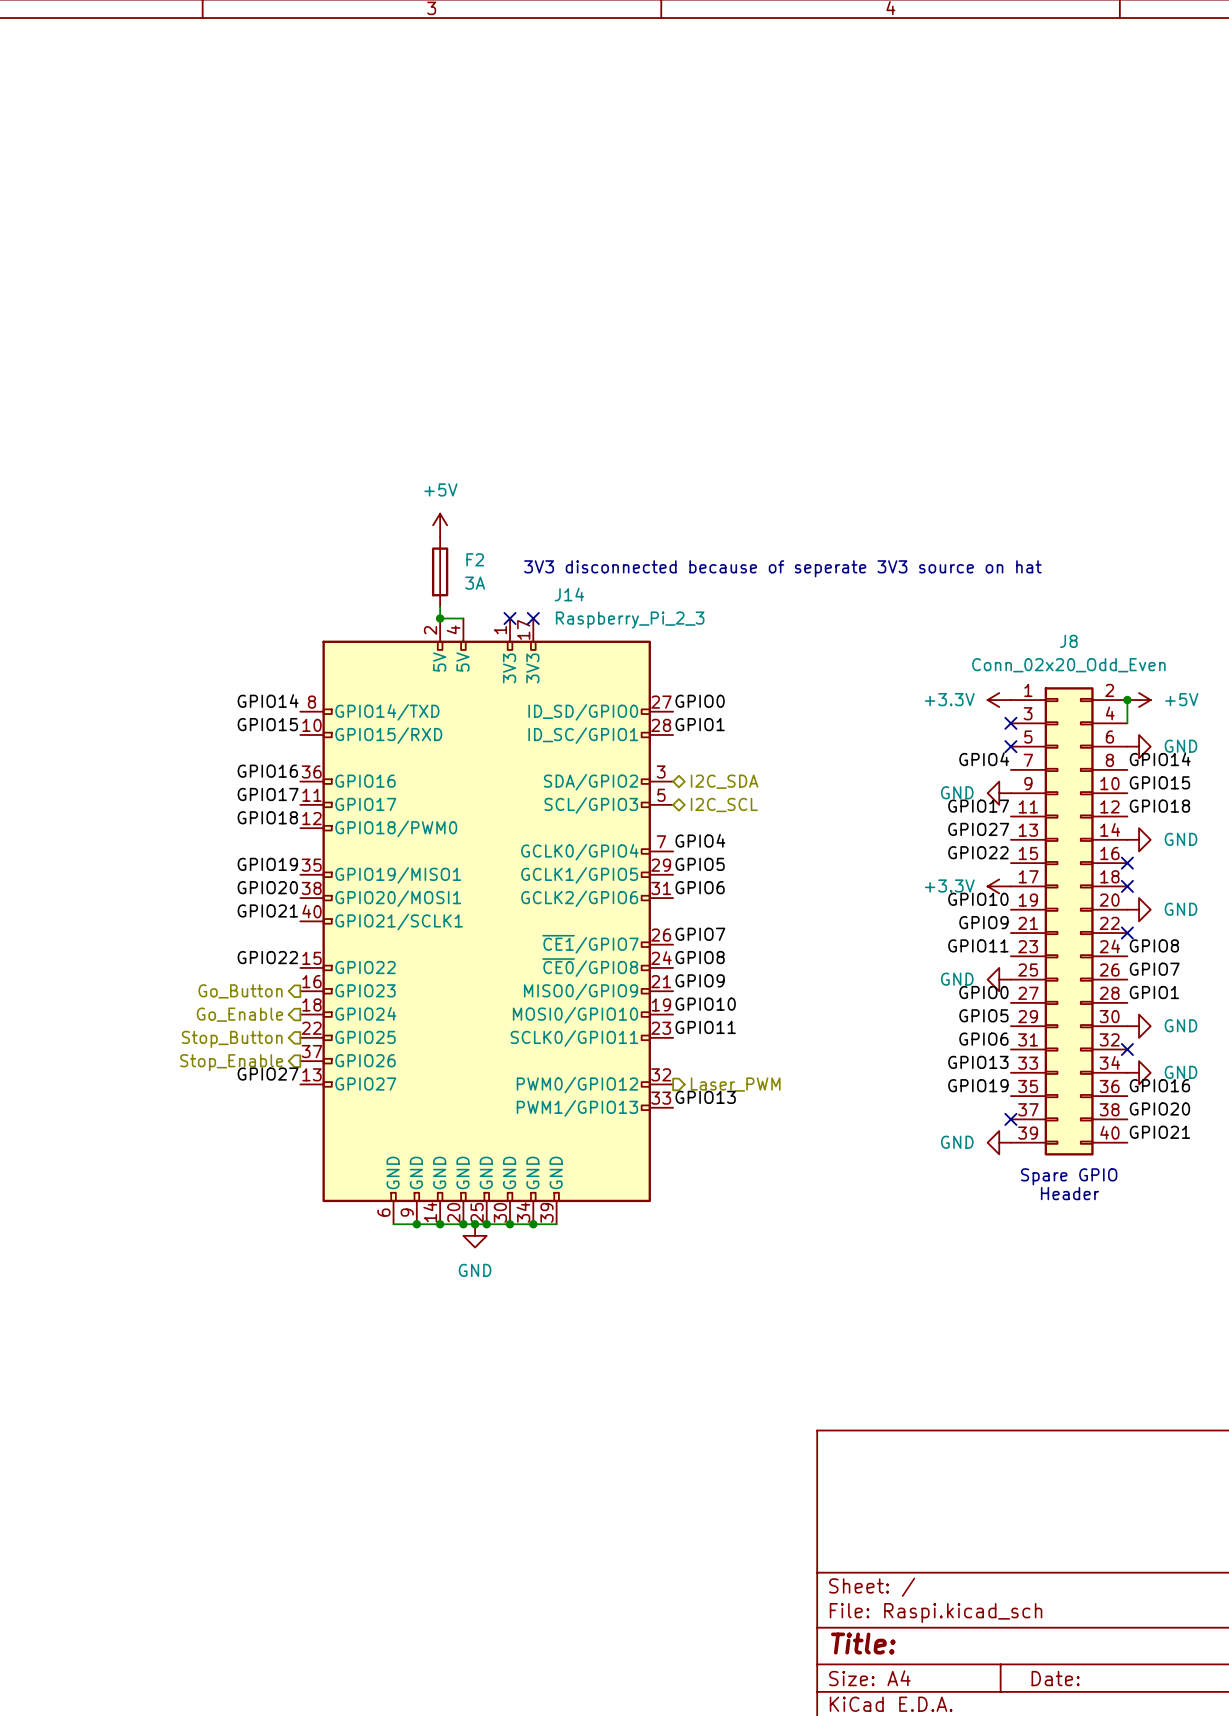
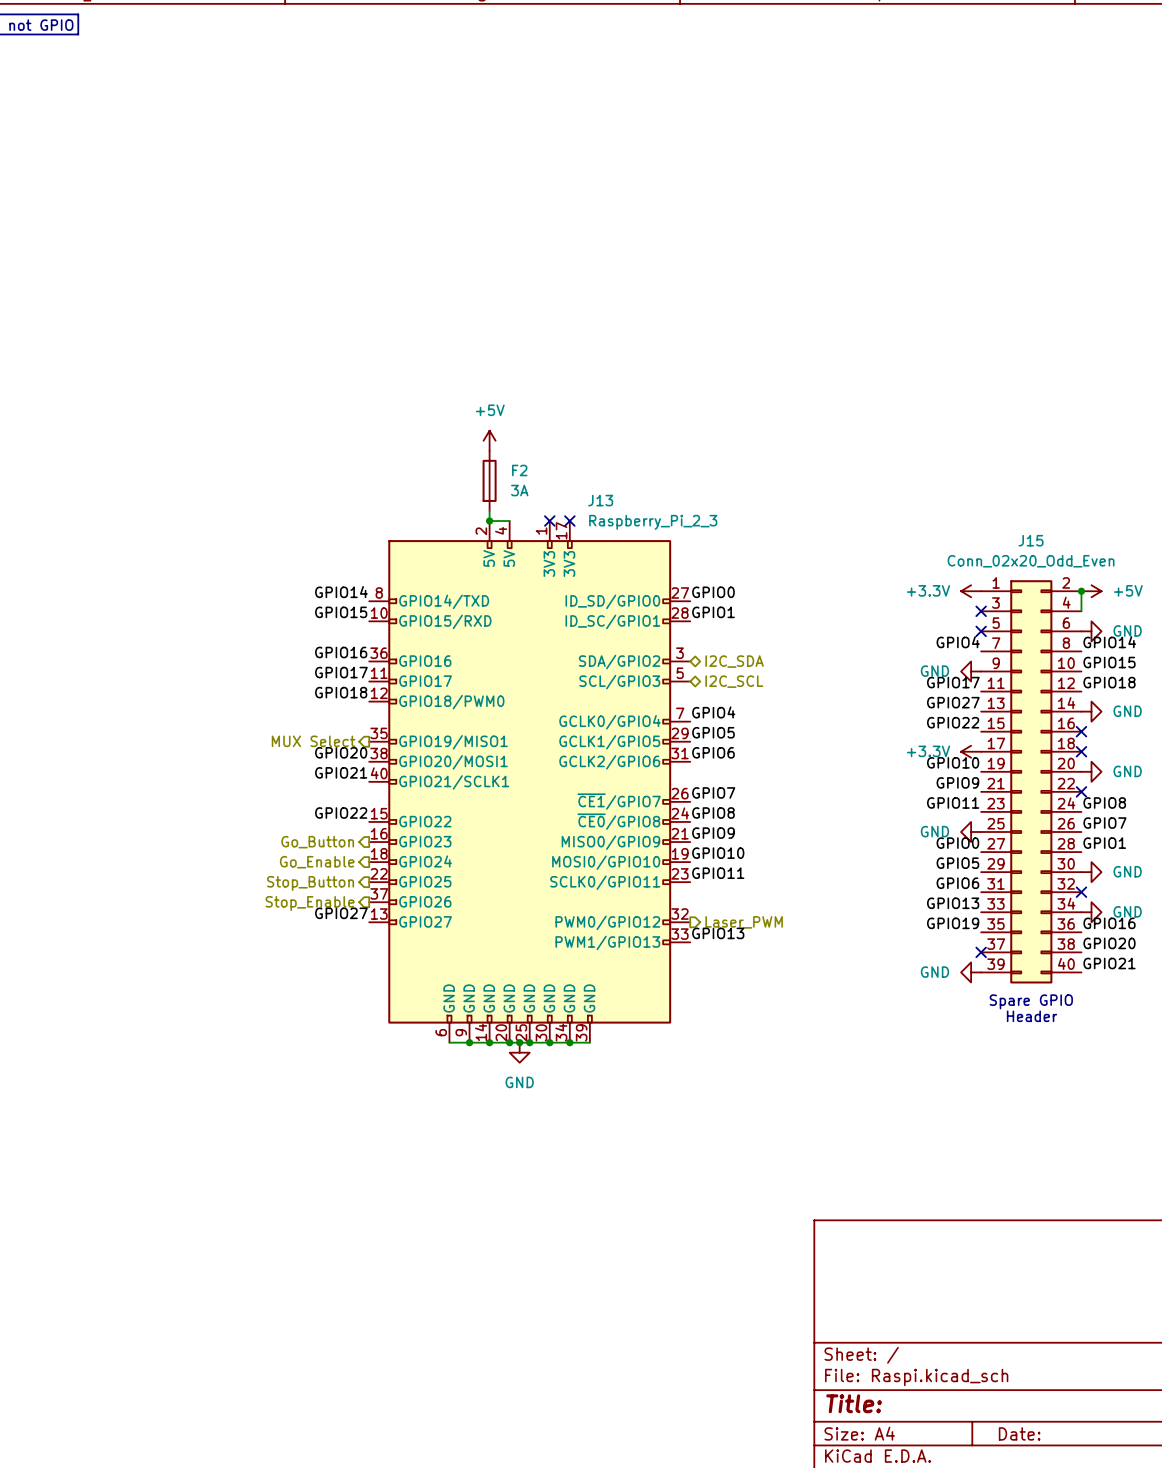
text: 3V3 disconnected because of seperate 3V3 source on hat (782, 568) -> none
J14 name: J14 (569, 594) -> J13 (600, 500)
J8 name: J8 (1068, 641) -> J15 (1031, 540)
label: GPIO19 (267, 864) -> none
hierarchical label: none -> MUX Select (313, 741)

